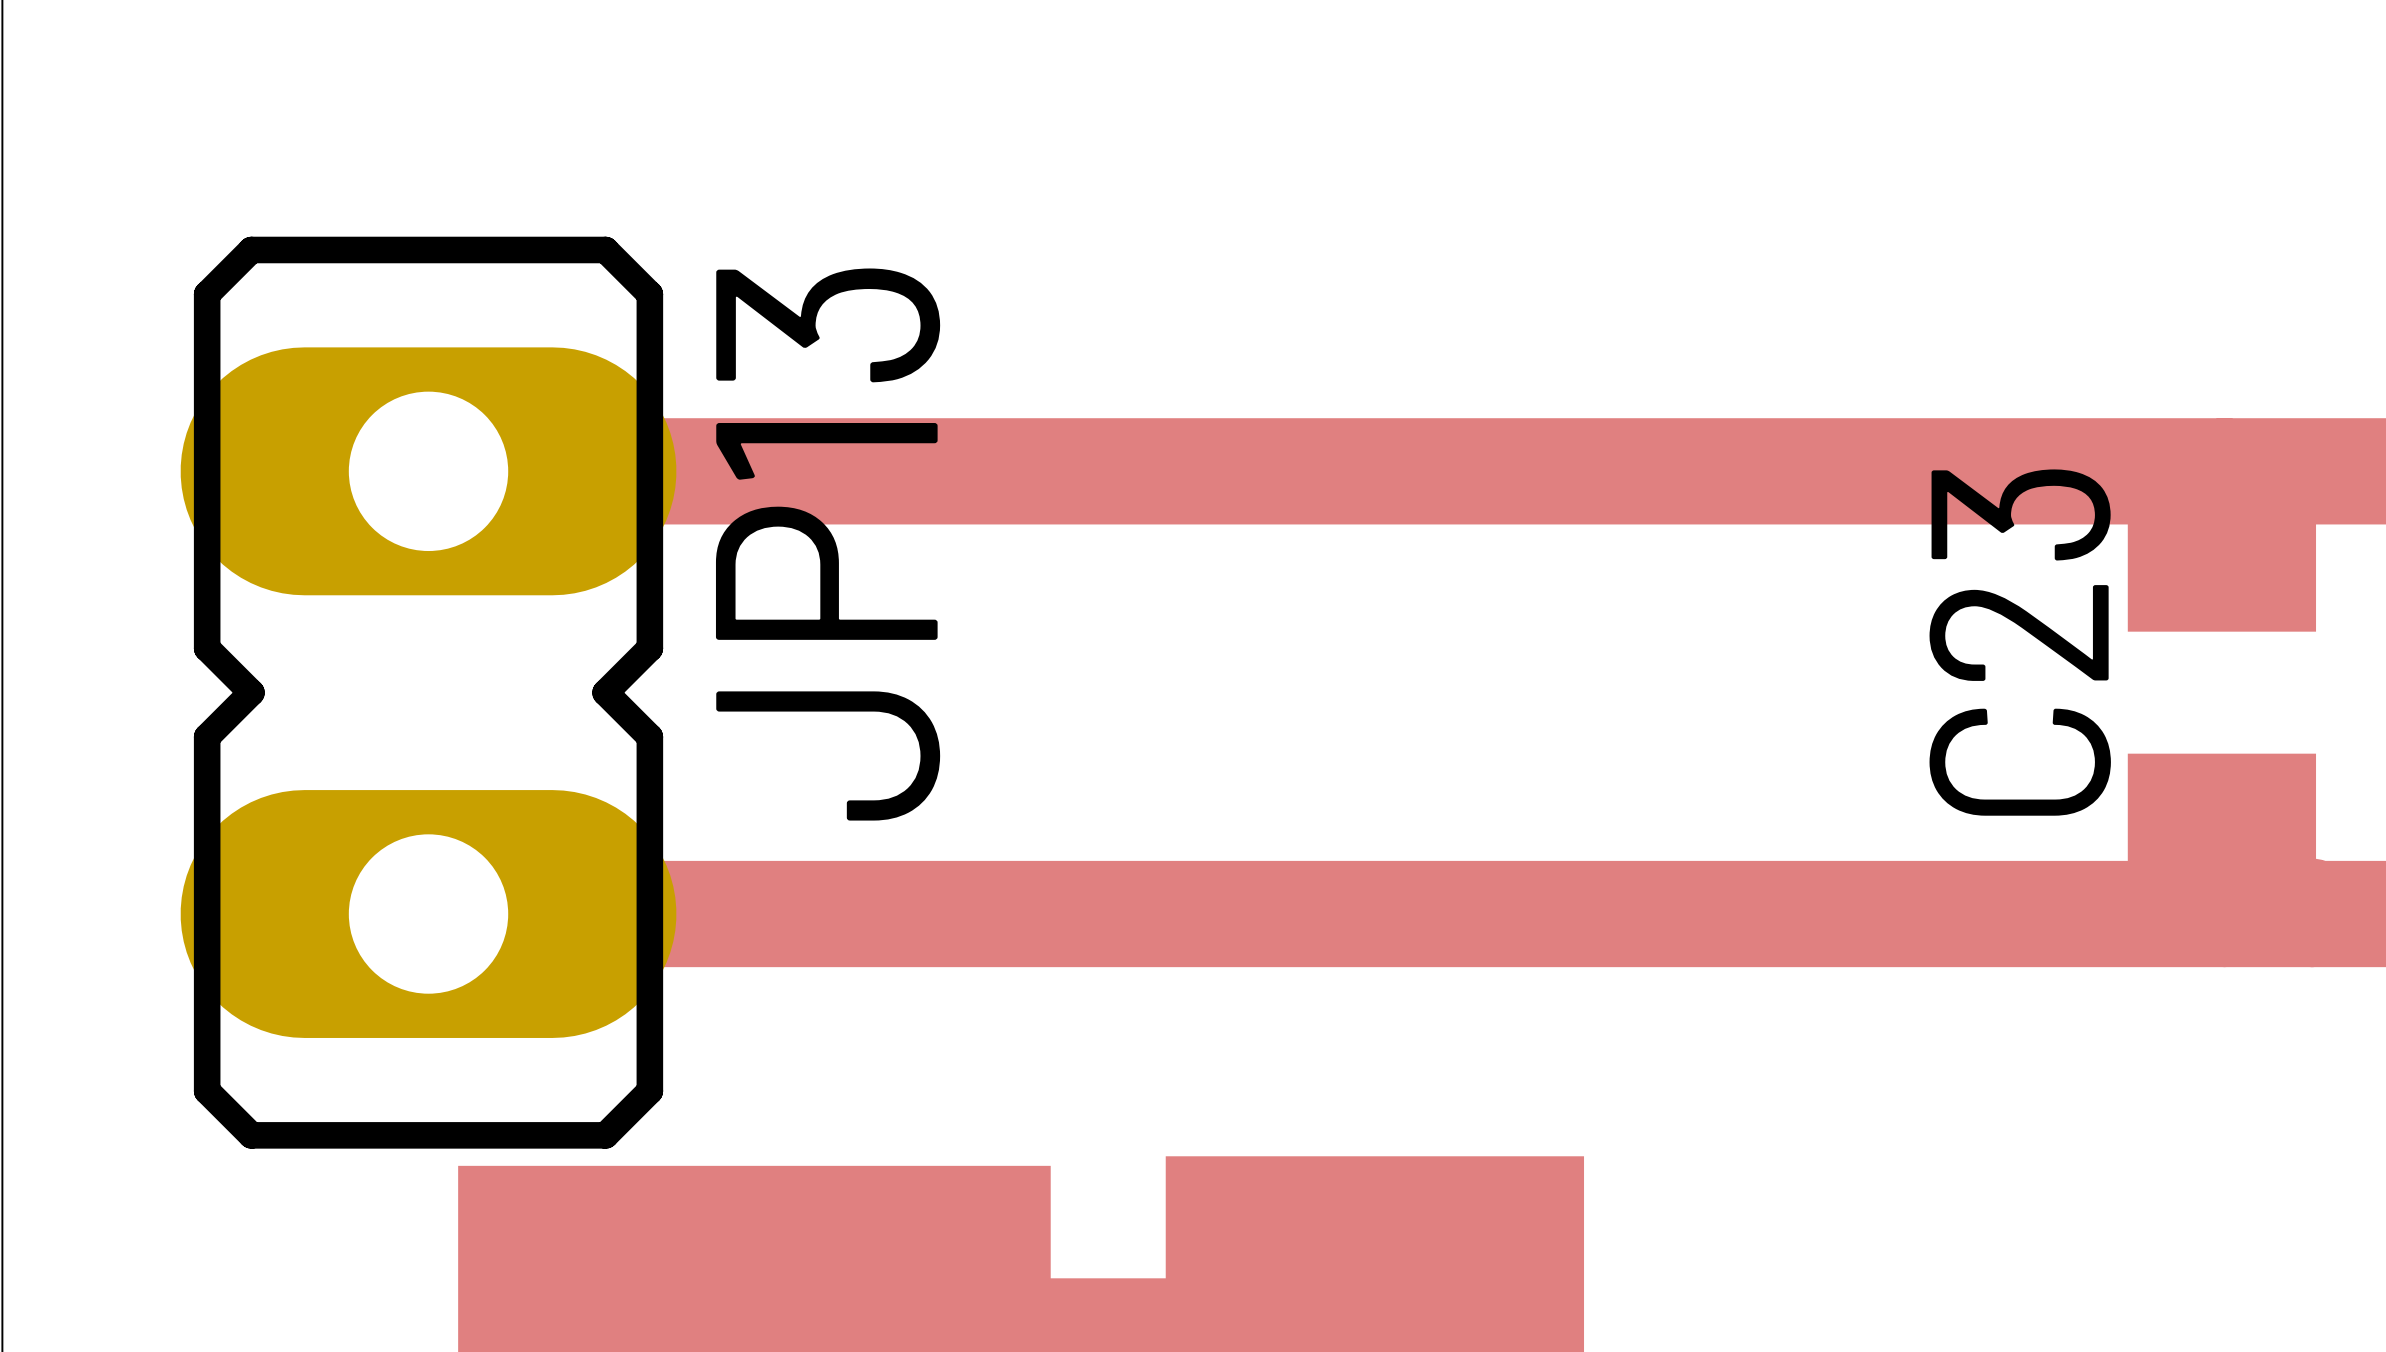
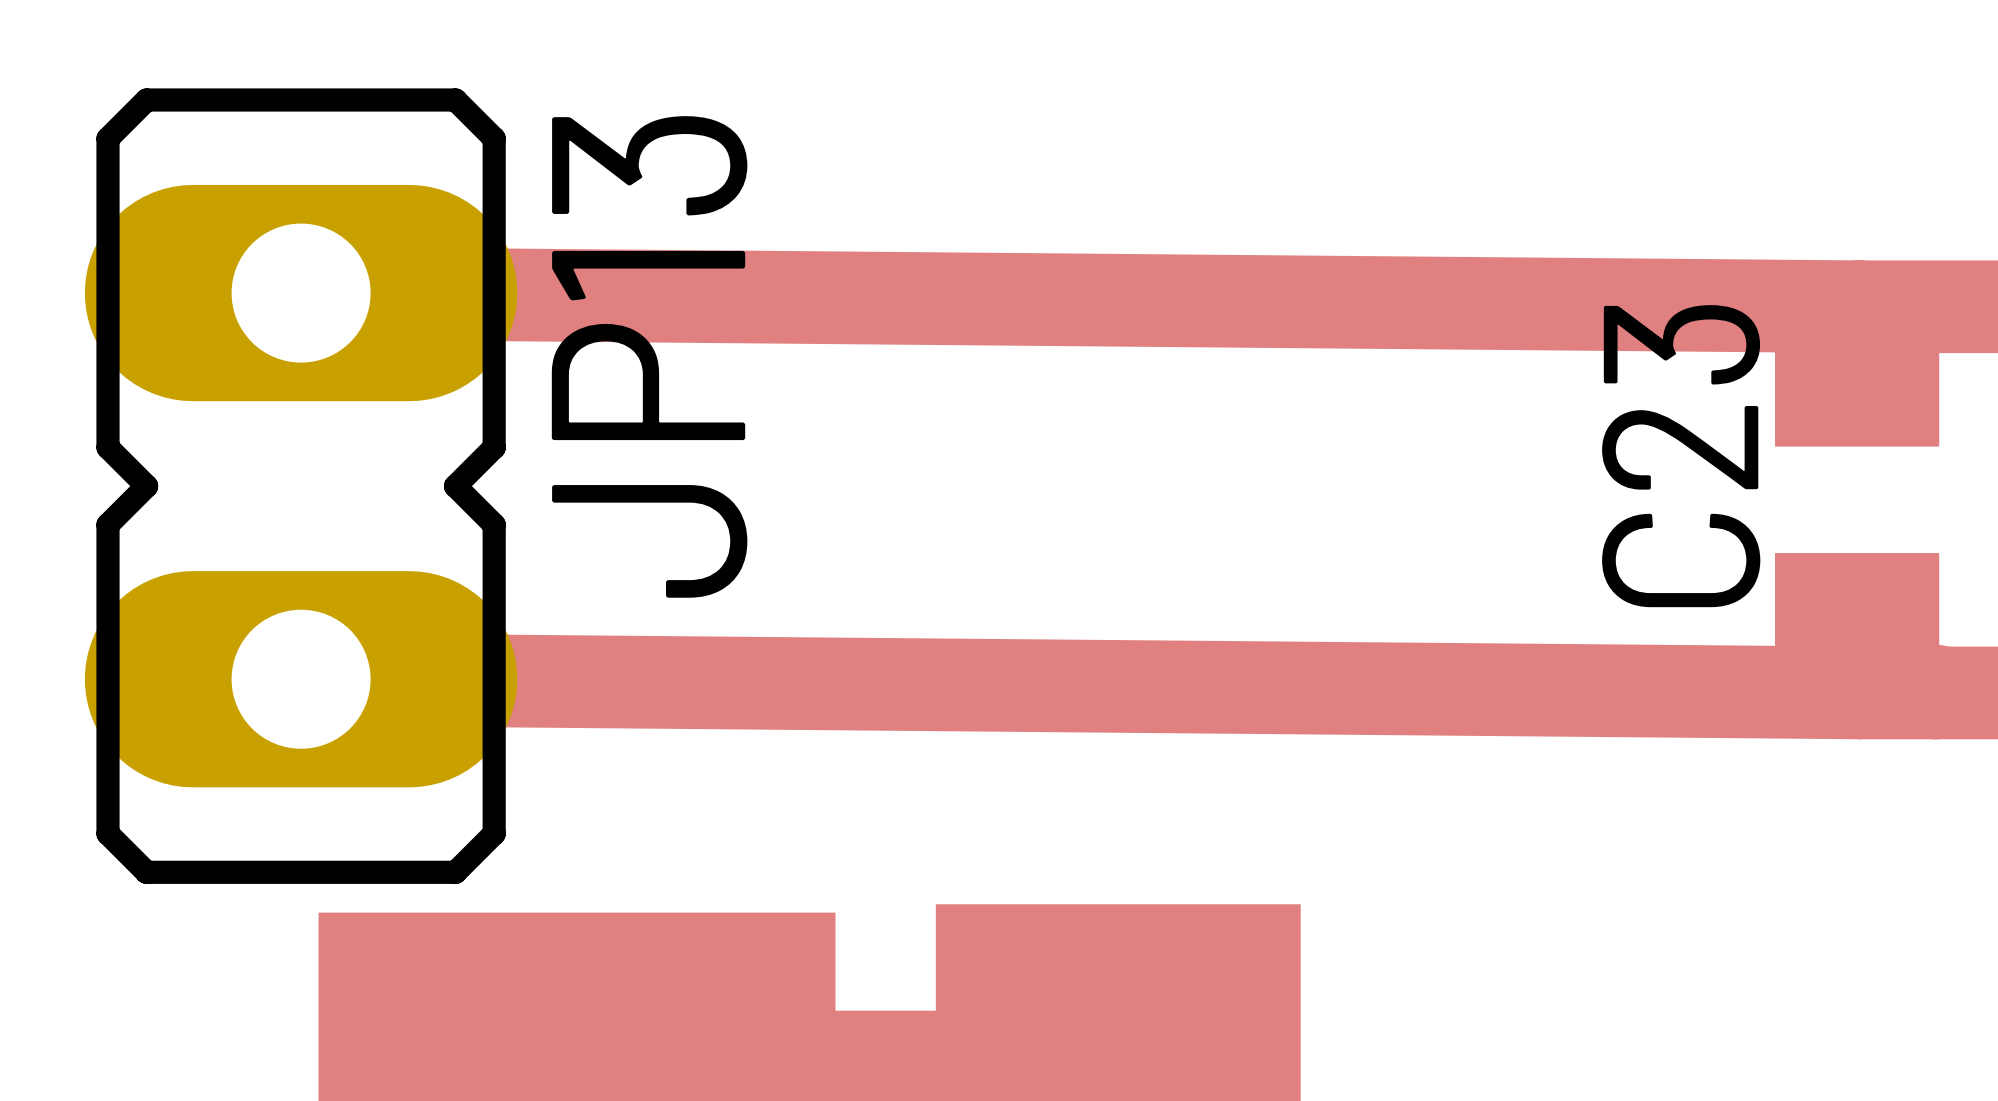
top track: (428, 471) (2224, 471) -> (301, 293) (1859, 306)
JP13 position: (428, 692) -> (301, 486)
top track: (428, 914) (2224, 914) -> (301, 679) (1859, 692)

